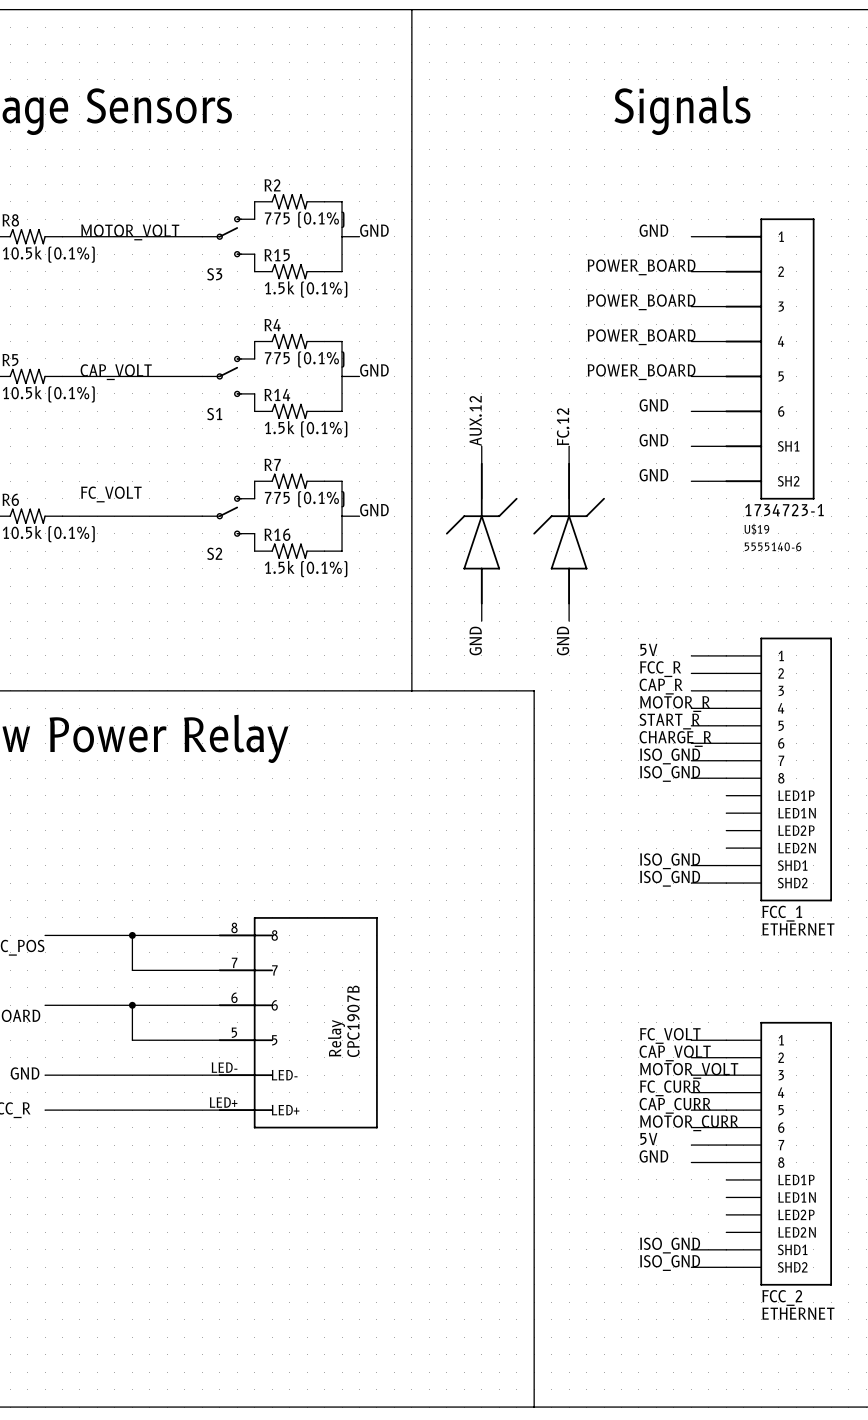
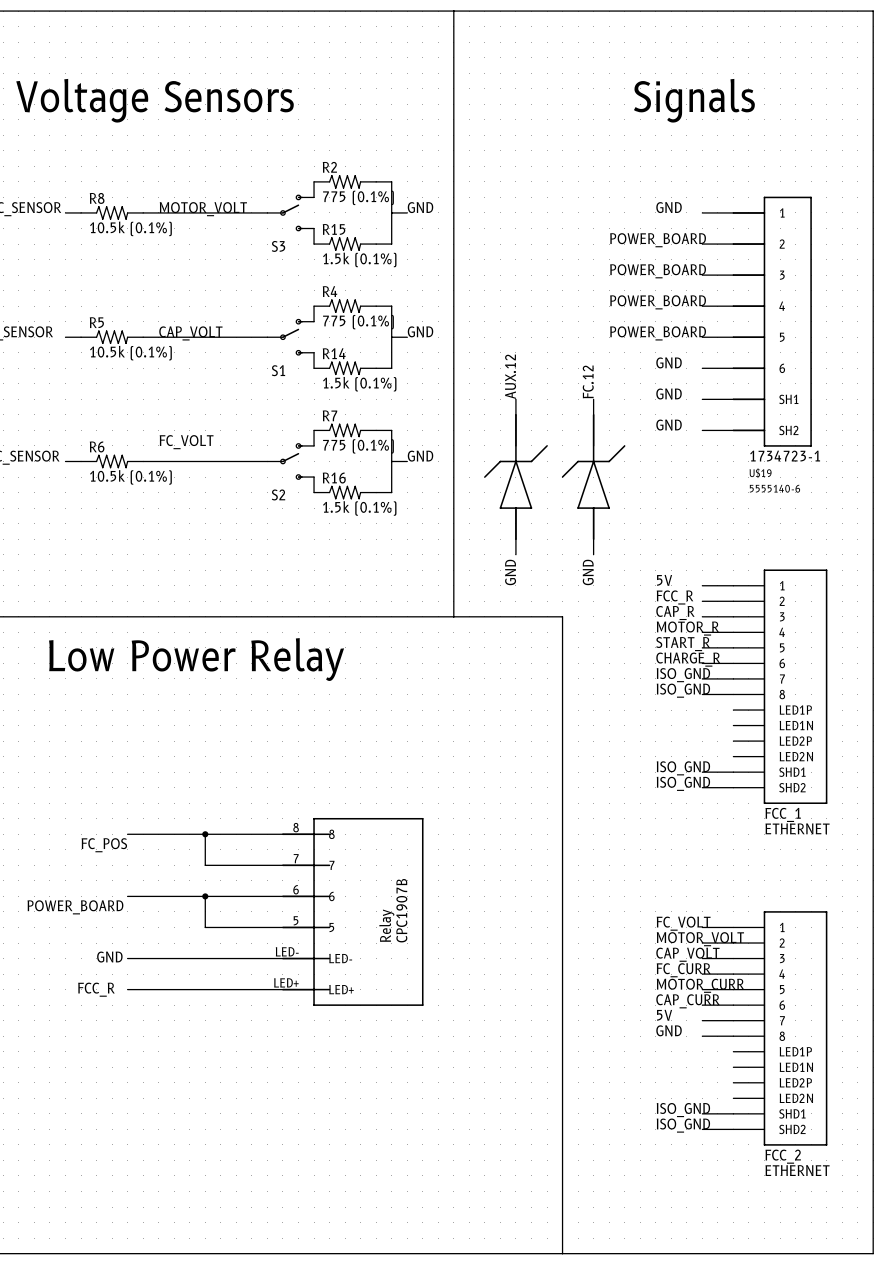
label: CAP_VOLT (675, 1053) -> MOTOR_VOLT (700, 939)
label: MOTOR_VOLT (689, 1070) -> CAP_VOLT (687, 954)
label: CAP_CURR (675, 1105) -> MOTOR_CURR (700, 985)
label: MOTOR_CURR (689, 1123) -> CAP_CURR (688, 1001)

